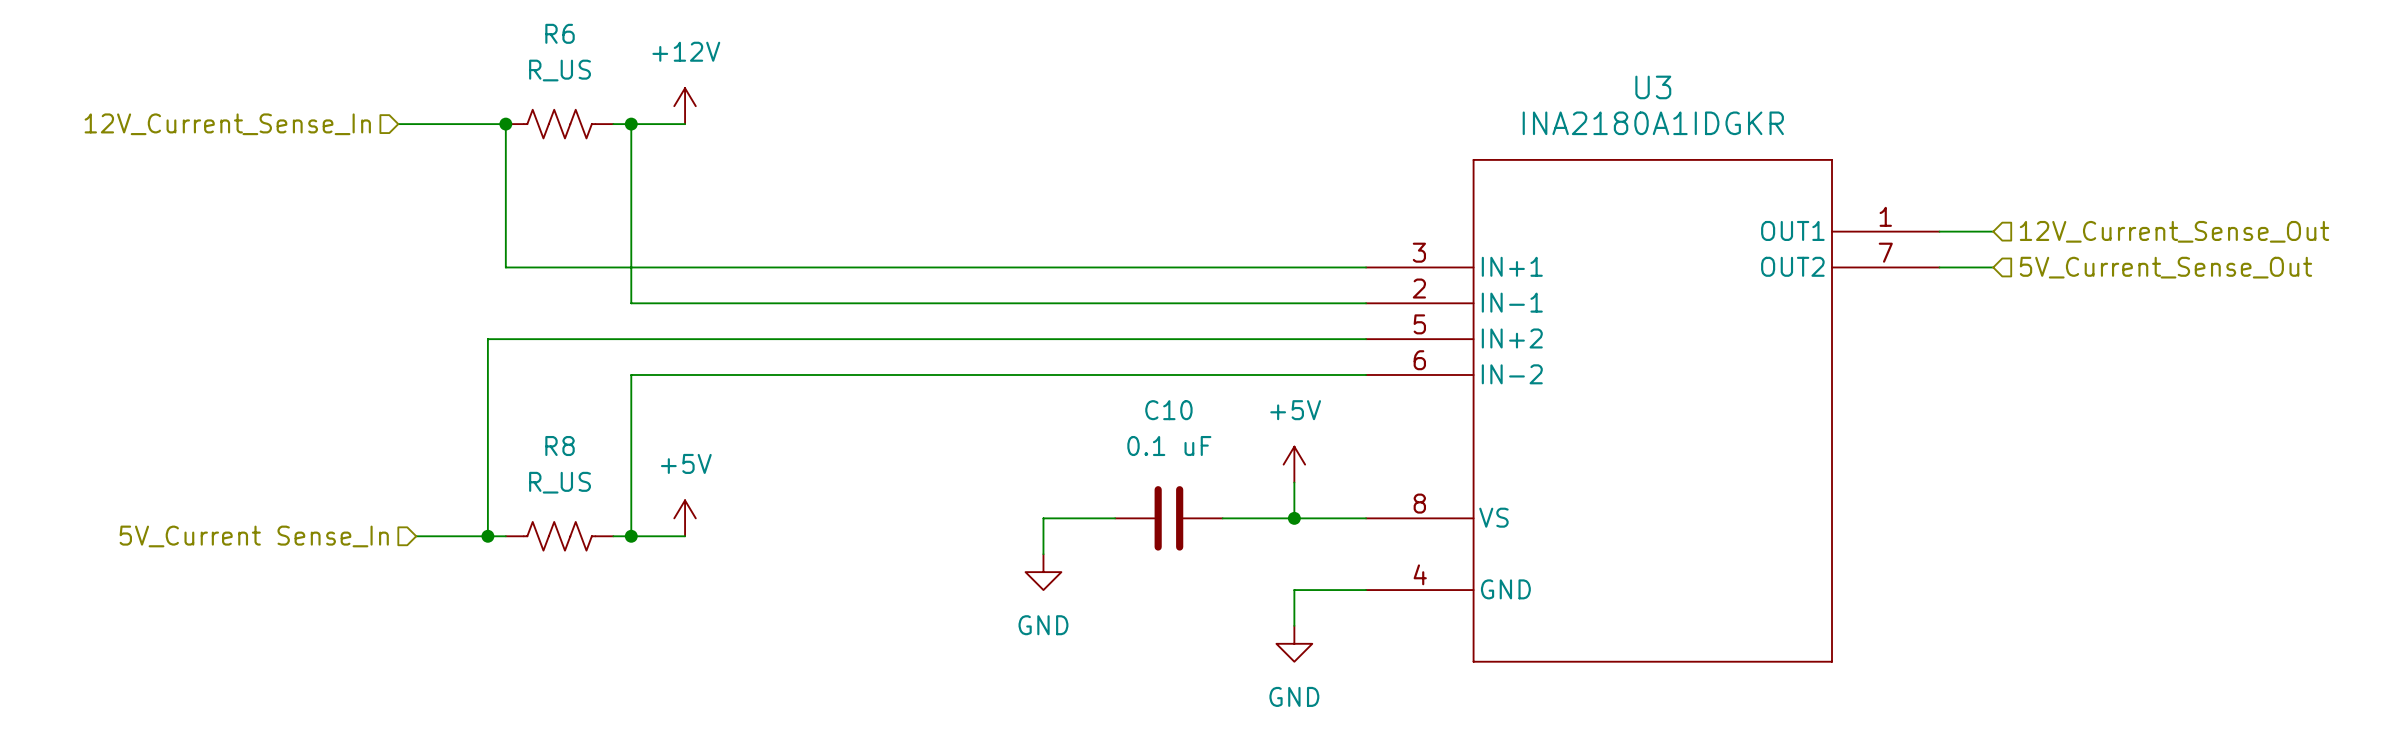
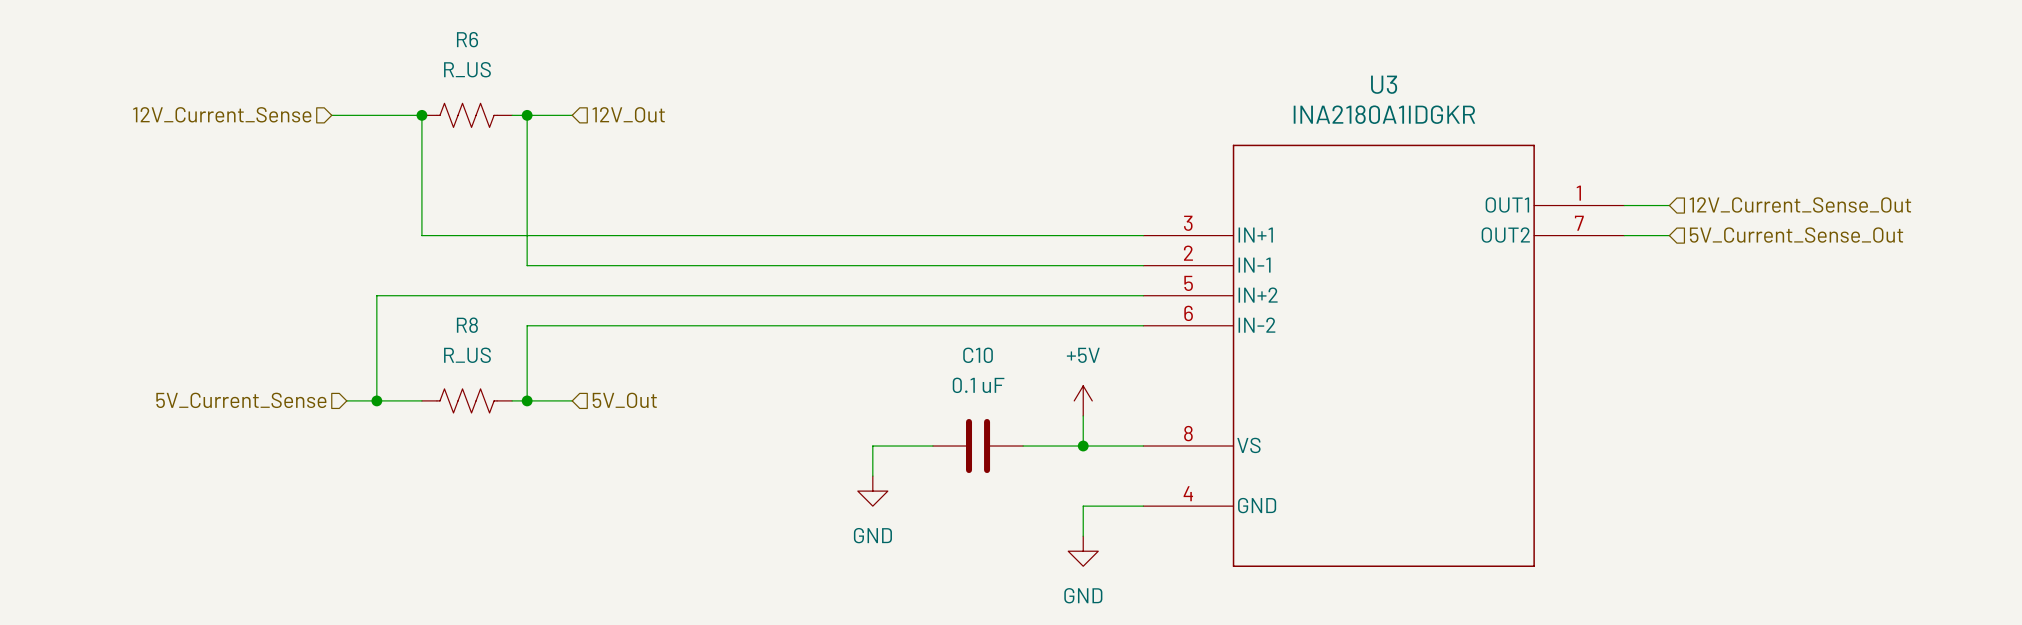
power symbol: +12V (685, 106) -> none
hierarchical label: 12V_Current_Sense_In (227, 124) -> 12V_Current_Sense (222, 114)
hierarchical label: none -> 12V_Out (628, 114)
wire: (487, 339) (487, 536) -> (406, 295) (376, 295) (376, 400)
hierarchical label: none -> 5V_Current_Sense (241, 400)
junction: none -> (376, 400)
wire: (631, 464) (631, 536) -> none
hierarchical label: none -> 5V_Out (624, 400)
power symbol: +5V (685, 518) -> none
hierarchical label: 5V_Current Sense_In (254, 536) -> none
wire: (416, 536) (505, 536) -> (346, 400) (421, 400)
junction: (487, 536) -> none
R8 position: (559, 536) -> (467, 400)
wire: (613, 536) (685, 536) -> (512, 400) (572, 400)
junction position: (631, 536) -> (527, 400)

